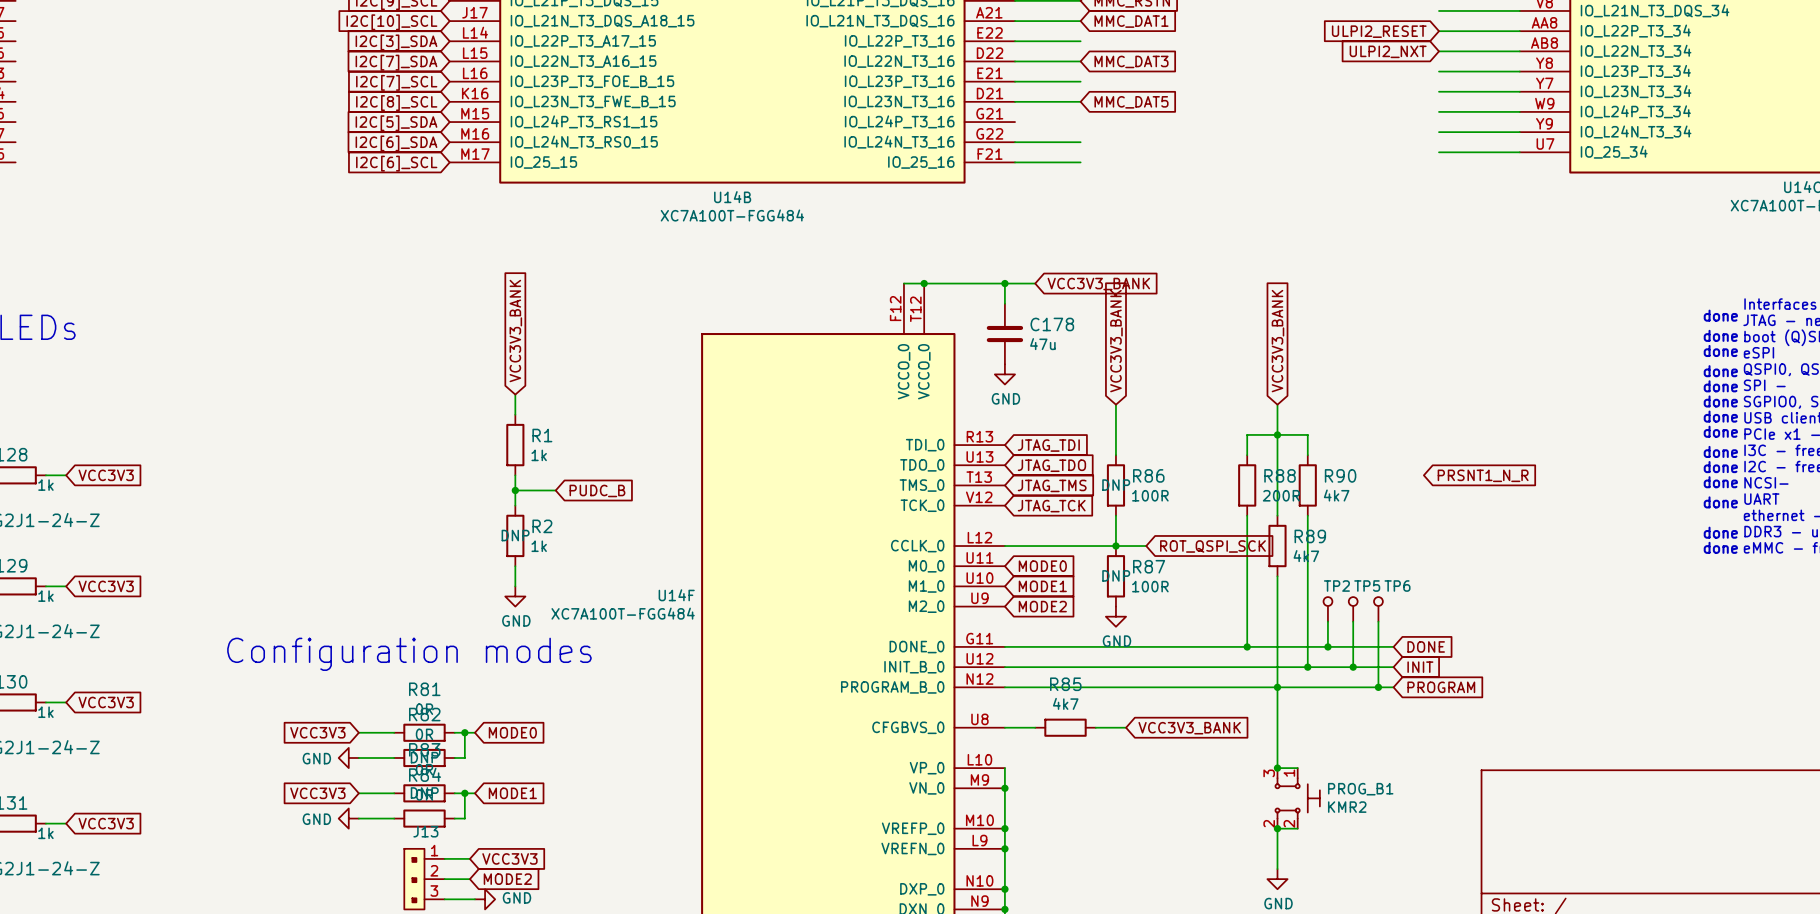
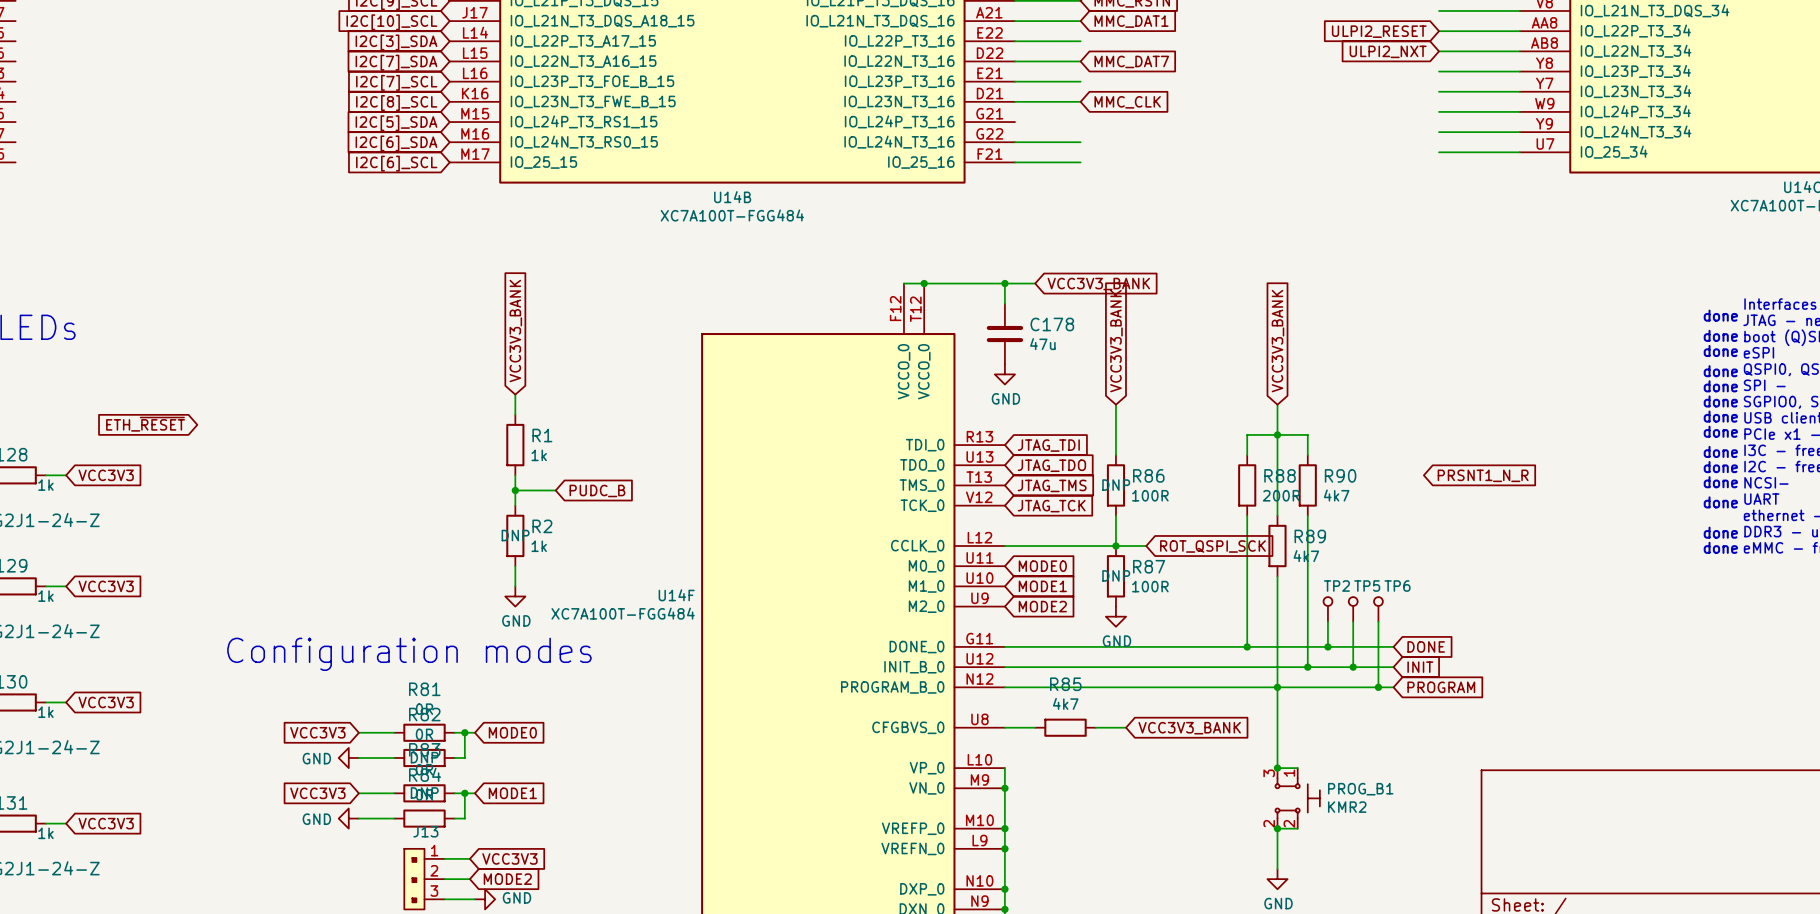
global label: MMC_DAT3 (1131, 61) -> MMC_DAT7 (1131, 61)
global label: MMC_DAT5 (1131, 102) -> MMC_CLK (1127, 102)
global label: none -> ETH_~{RESET} (145, 424)

